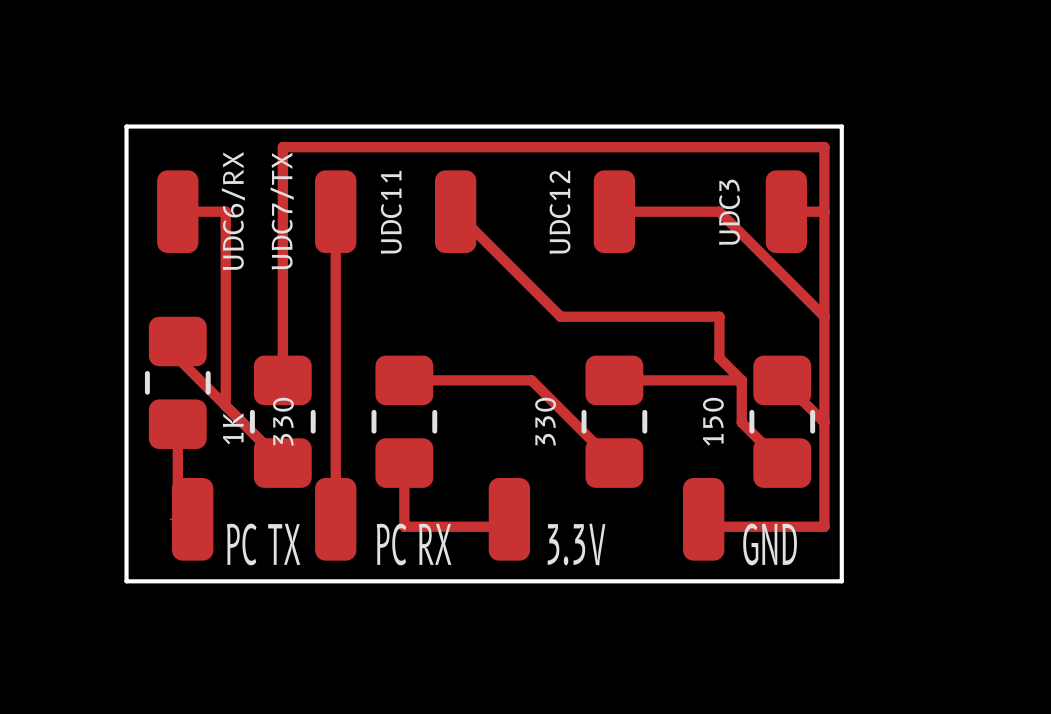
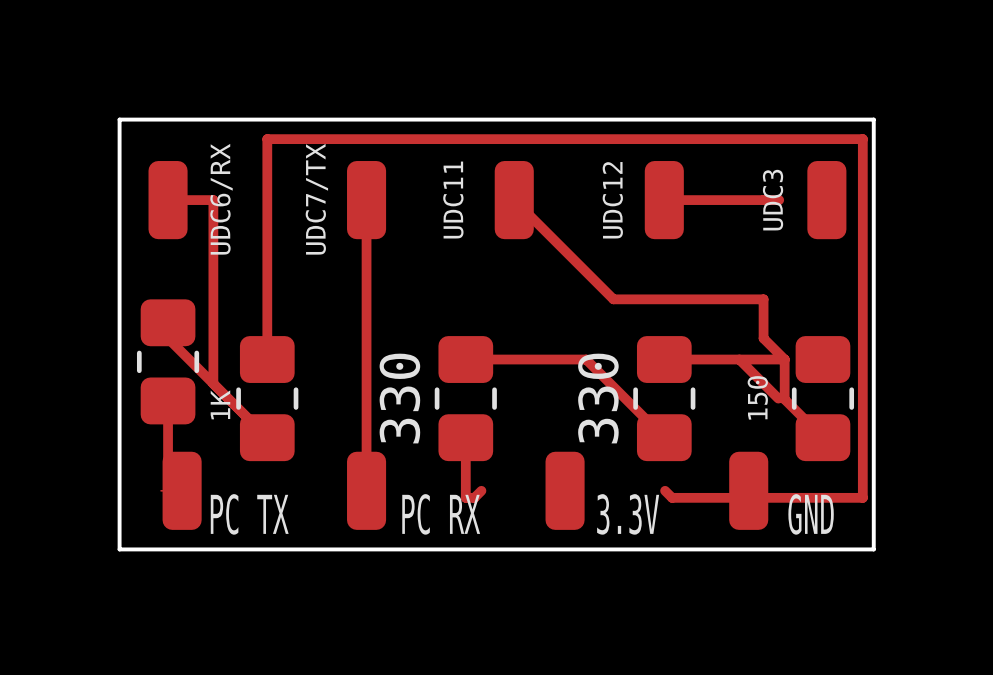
board edge: (841, 126) (841, 581) -> (795, 119) (873, 119) (873, 549) (795, 549)
top track: (824, 147) (824, 526) -> (779, 139) (862, 139) (862, 497) (779, 497)
top track: (335, 211) (335, 519) -> (366, 200) (366, 490)
UDC7/TX position: (335, 211) -> (366, 200)
top track: (455, 211) (560, 316) (649, 316) -> (514, 200) (613, 299)
UDC11 position: (455, 211) -> (514, 200)
top track: (614, 211) (702, 211) -> (701, 359) (784, 359)
UDC12 position: (614, 211) -> (664, 200)
top track: (719, 211) (824, 316) -> (679, 200) (743, 200)
UDC3 position: (786, 211) -> (826, 200)
top track: (719, 316) (719, 358) (741, 380) (741, 422) (782, 463) -> (679, 299) (763, 299) (763, 338) (784, 359)
top track: (404, 380) (492, 380) -> none
top track: (531, 380) (614, 463) -> (502, 359) (580, 359)
top track: (620, 380) (702, 380) -> (586, 359) (664, 437)
top track: none -> (784, 359) (784, 399) (822, 437)
330: (404, 421) -> none
330: none -> (465, 398)
330: (614, 421) -> none
330: none -> (664, 398)
150 position: (782, 421) -> (822, 398)
top track: (404, 463) (404, 526) (492, 526) -> (465, 437) (465, 497)
PC RX position: (335, 519) -> (366, 490)
3.3V position: (509, 519) -> (565, 490)
GND position: (703, 519) -> (748, 490)

